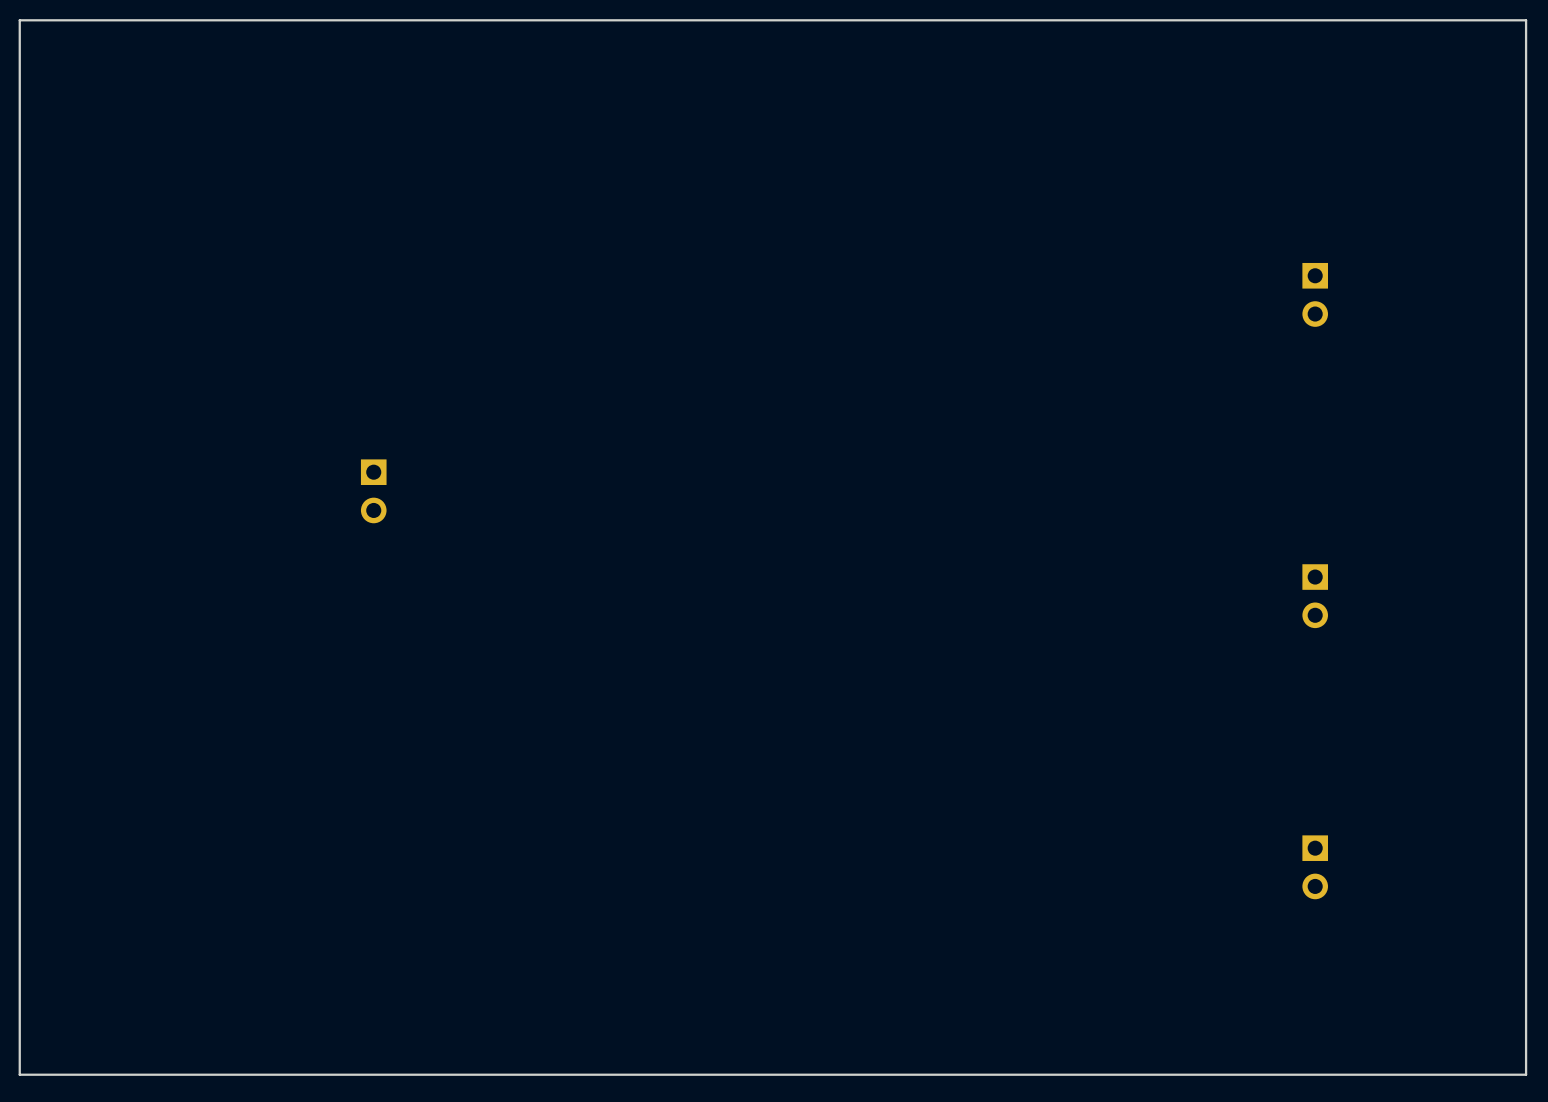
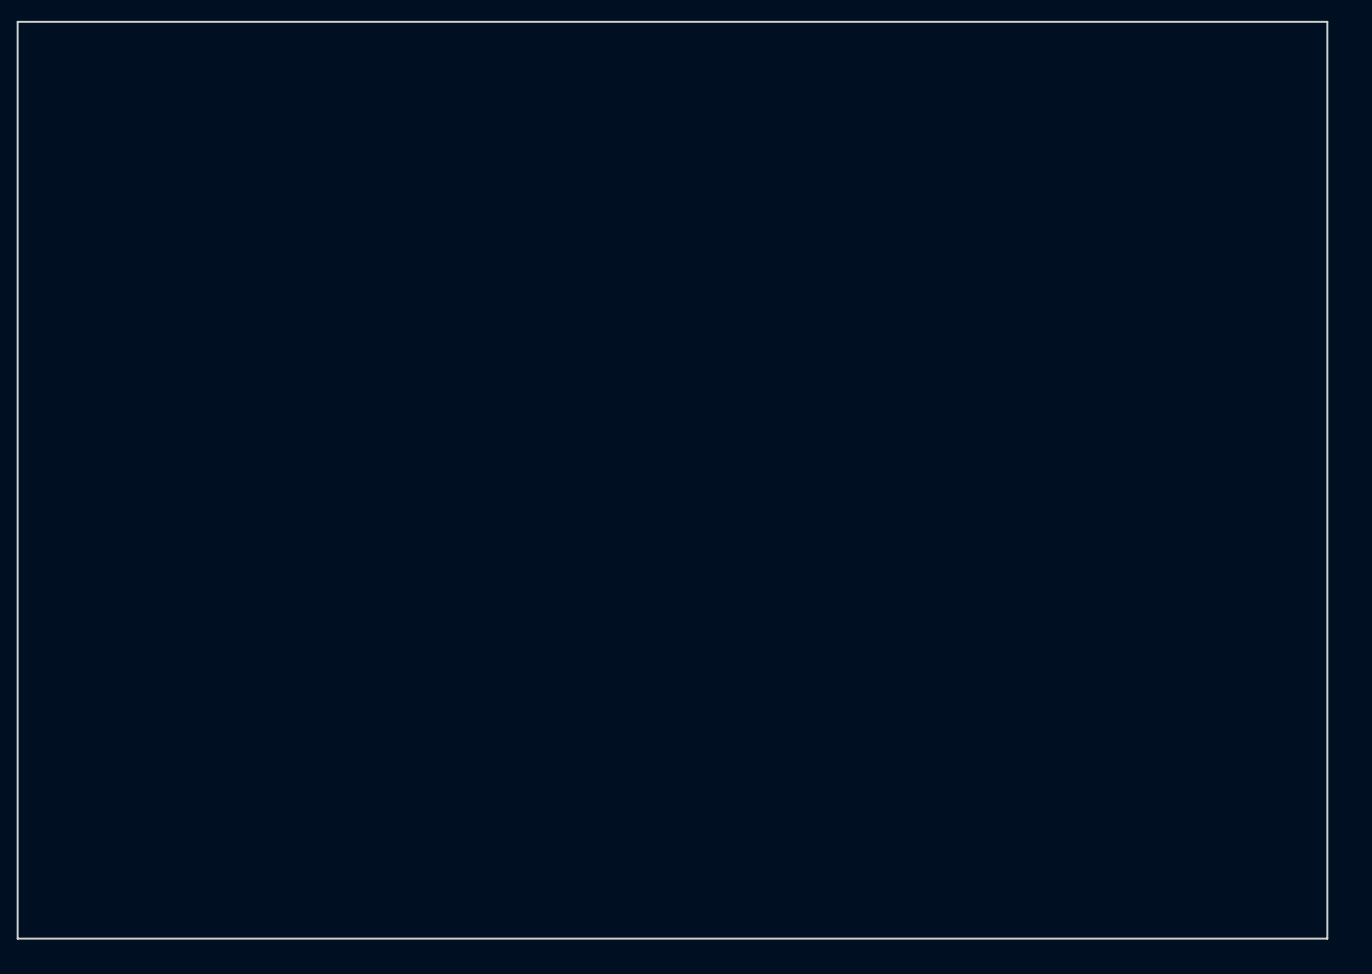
part: (1315, 294) -> none
part: (373, 491) -> none
part: (1315, 596) -> none
part: (1315, 867) -> none

